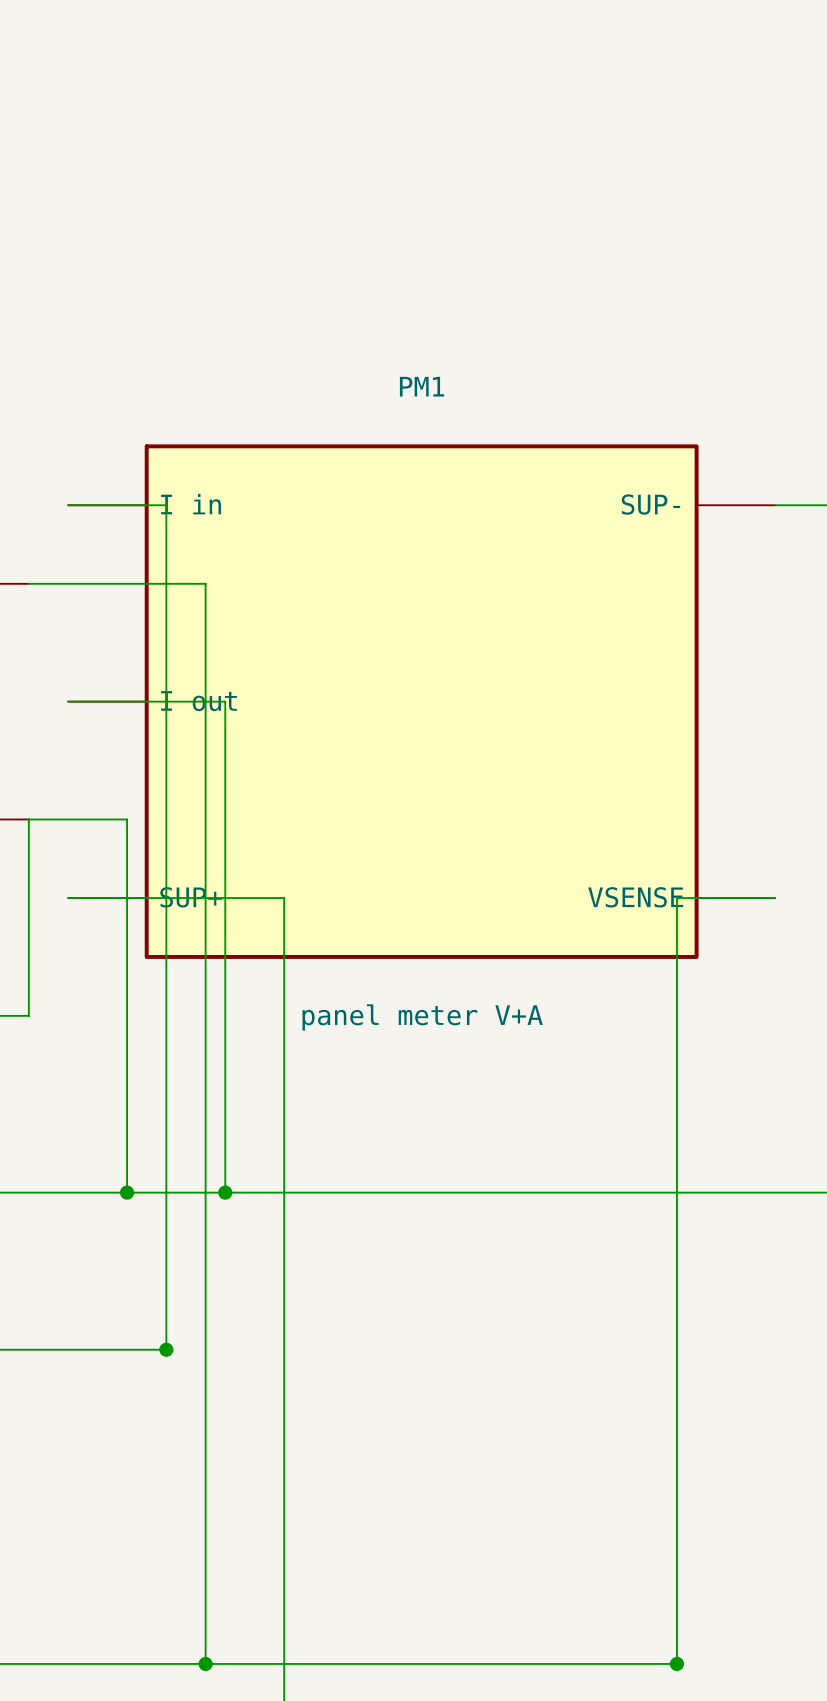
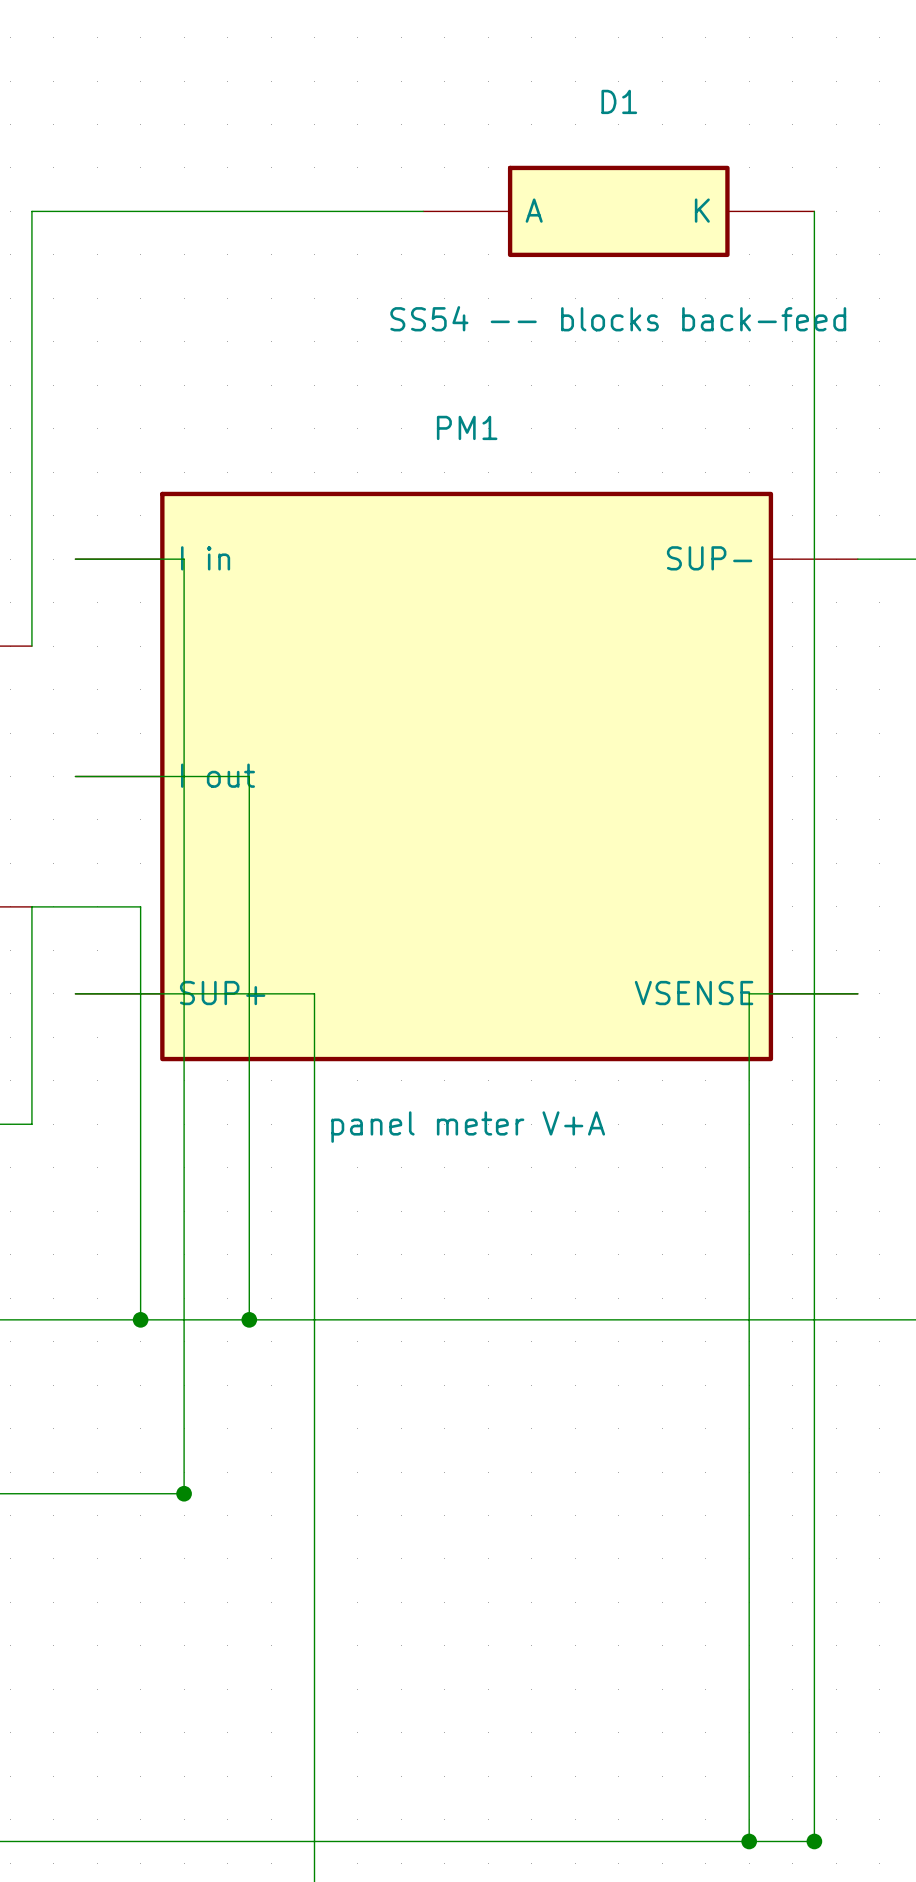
D1: none -> SS54 -- blocks back-feed (618, 211)
wire: none -> (814, 211) (814, 1841) (749, 1841)
wire: (28, 583) (205, 583) (205, 1663) -> (31, 646) (31, 211) (423, 211)
junction: (205, 1663) -> none
junction: none -> (814, 1841)

